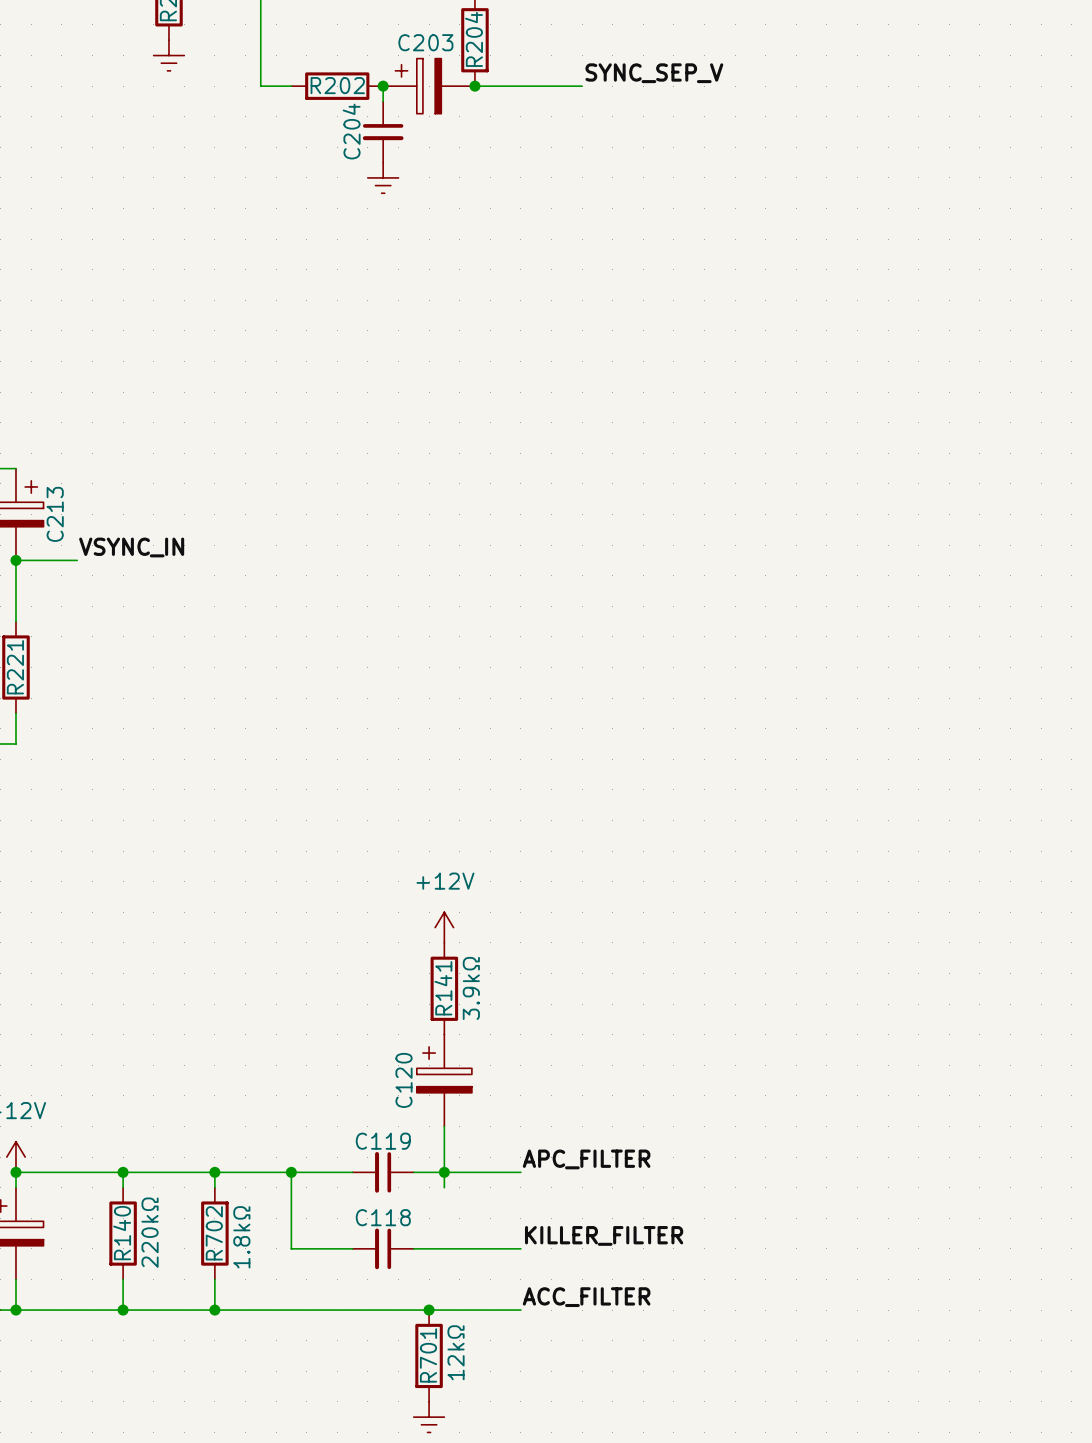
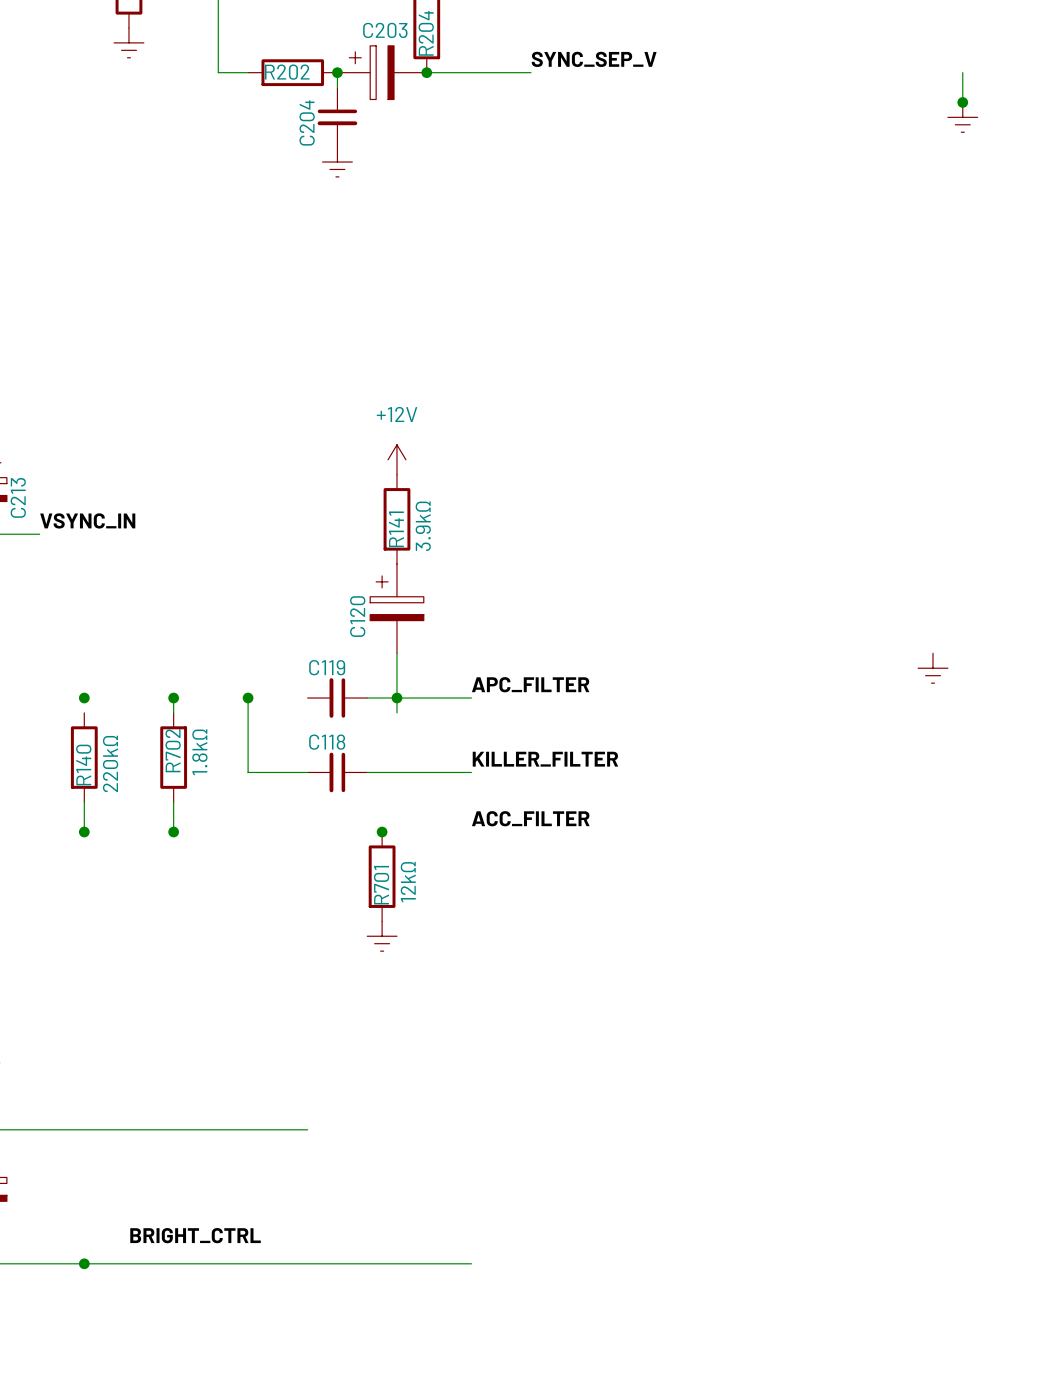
wire: none -> (962, 72) (962, 102)
junction: none -> (962, 102)
power symbol: none -> (962, 117)
power symbol: none -> +12V (396, 459)
wire: none -> (396, 653) (396, 712)
power symbol: none -> (932, 668)
label: none -> APC_FILTER (530, 684)
junction: none -> (84, 698)
wire: none -> (173, 698) (173, 712)
junction: none -> (173, 698)
wire: none -> (248, 698) (248, 772) (307, 772)
junction: none -> (248, 698)
wire: none -> (367, 698) (471, 698)
junction: none -> (396, 698)
label: none -> KILLER_FILTER (545, 759)
wire: none -> (367, 772) (471, 772)
wire: none -> (84, 802) (84, 832)
wire: none -> (173, 802) (173, 832)
label: none -> ACC_FILTER (530, 818)
junction: none -> (84, 832)
junction: none -> (173, 832)
junction: none -> (382, 832)
power symbol: +12V (444, 927) -> none
power symbol: none -> (382, 936)
R141 position: (444, 988) -> (396, 519)
C120 position: (444, 1080) -> (396, 608)
wire: (444, 1126) (444, 1187) -> none
label: APC_FILTER (586, 1159) -> none
wire: (123, 1172) (123, 1187) -> none
junction: (123, 1172) -> none
wire: (214, 1172) (214, 1187) -> none
junction: (214, 1172) -> none
wire: (291, 1172) (291, 1248) (352, 1248) -> none
junction: (291, 1172) -> none
C119 position: (383, 1172) -> (337, 698)
wire: (413, 1172) (520, 1172) -> none
junction: (444, 1172) -> none
R140 position: (123, 1233) -> (84, 757)
R702 position: (214, 1233) -> (173, 757)
label: KILLER_FILTER (604, 1235) -> none
C118 position: (383, 1248) -> (337, 772)
wire: (413, 1248) (520, 1248) -> none
wire: (123, 1279) (123, 1310) -> none
wire: (214, 1279) (214, 1310) -> none
label: none -> BRIGHT_CTRL (195, 1235)
label: ACC_FILTER (586, 1297) -> none
junction: (214, 1310) -> none
junction: (429, 1310) -> none
R701 position: (429, 1355) -> (382, 876)
power symbol: (429, 1417) -> none

